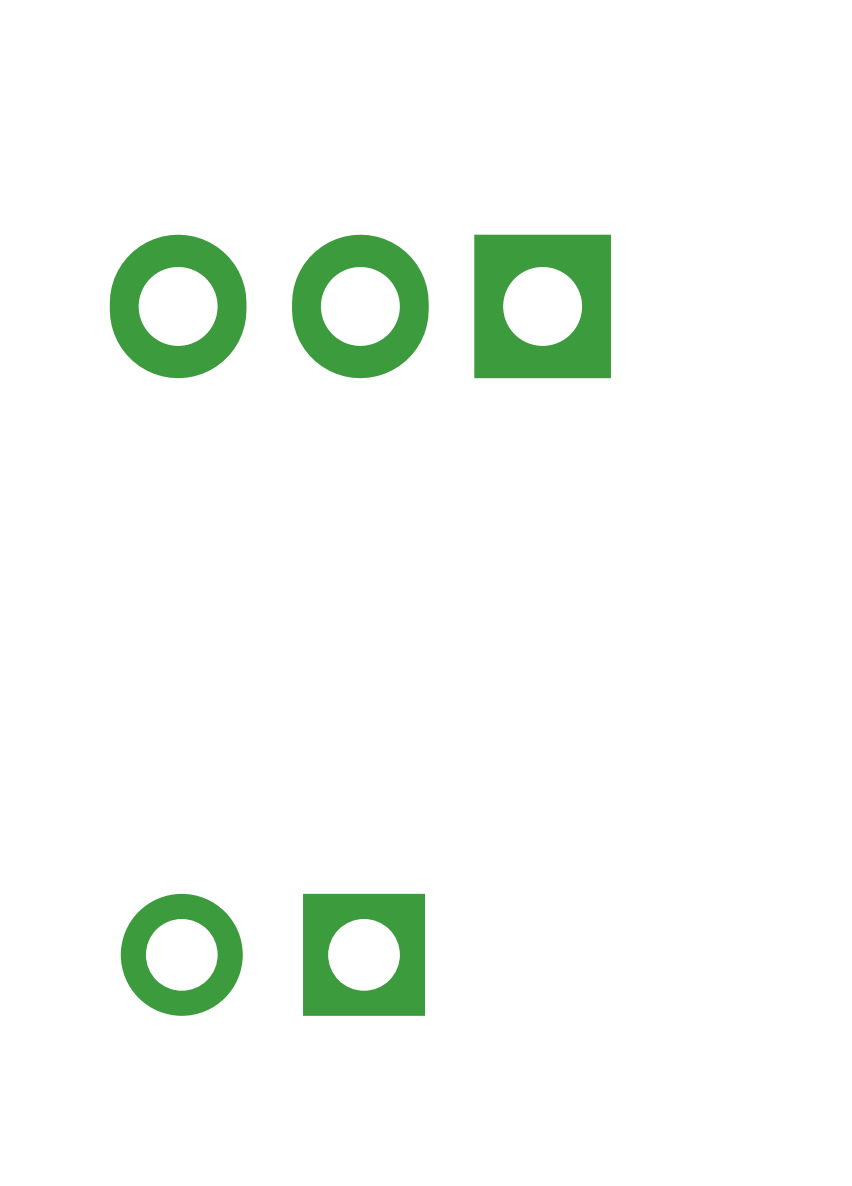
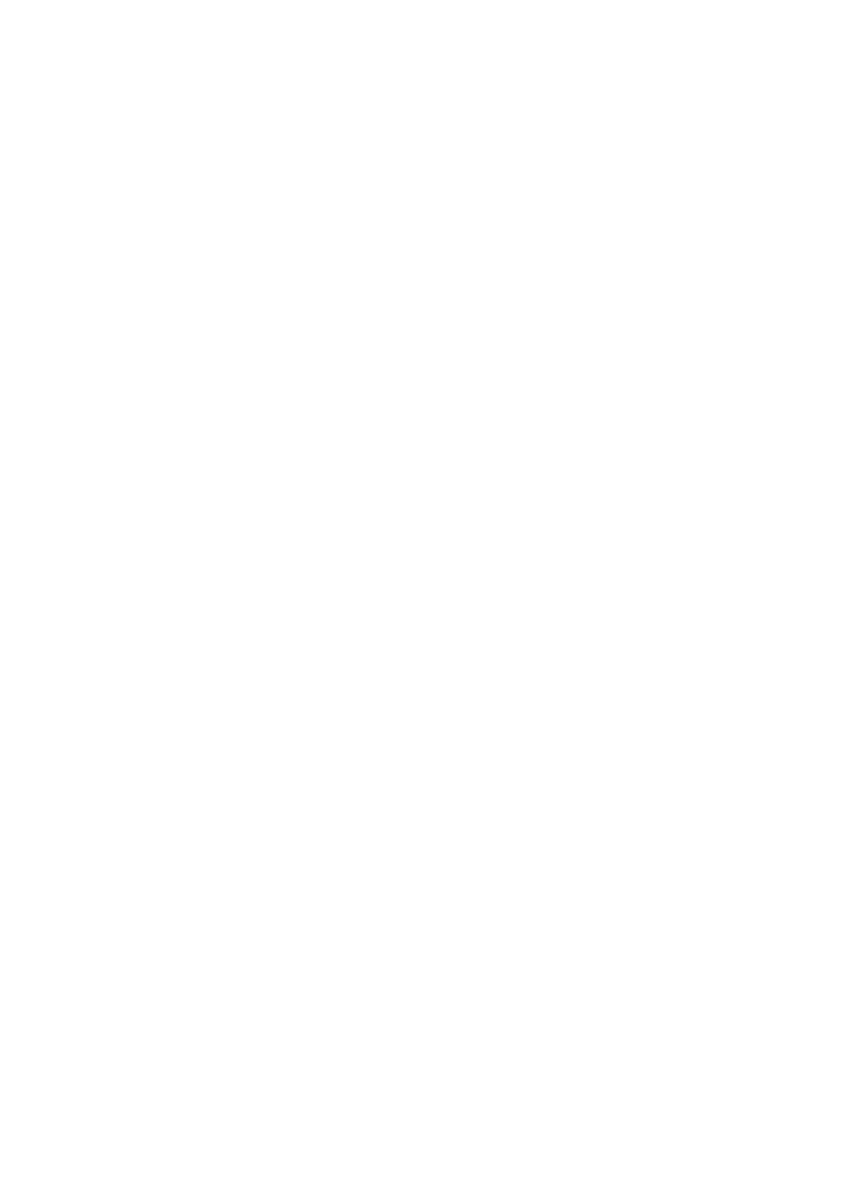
part: (360, 306) -> none
part: (272, 954) -> none

